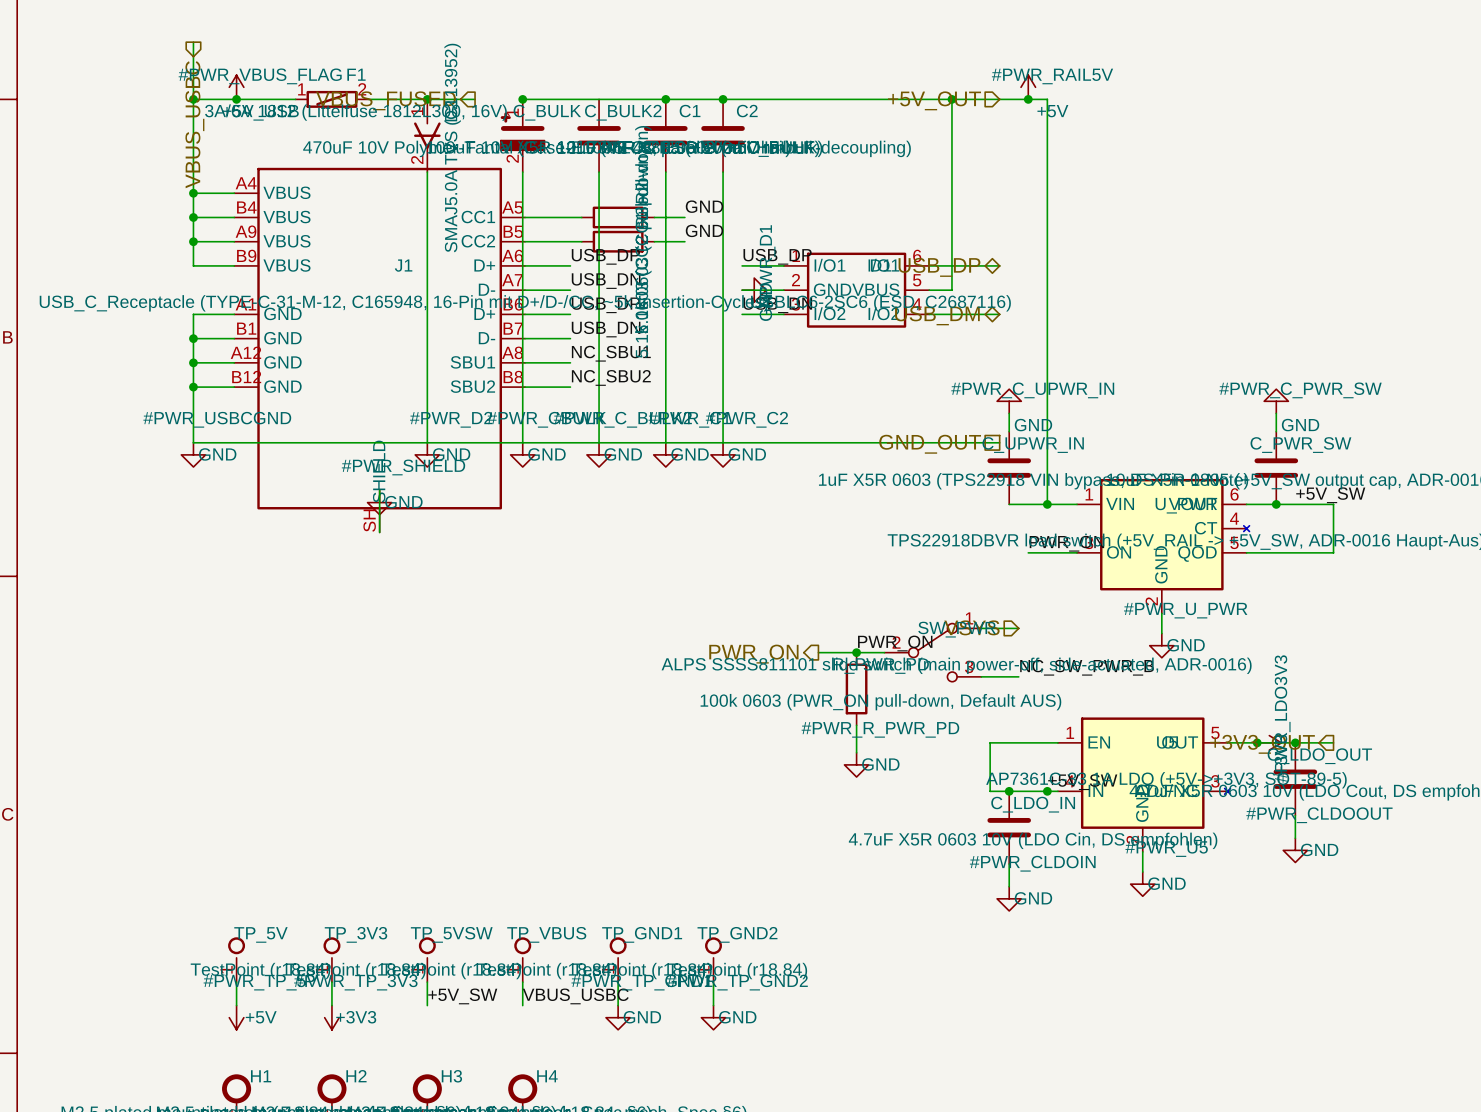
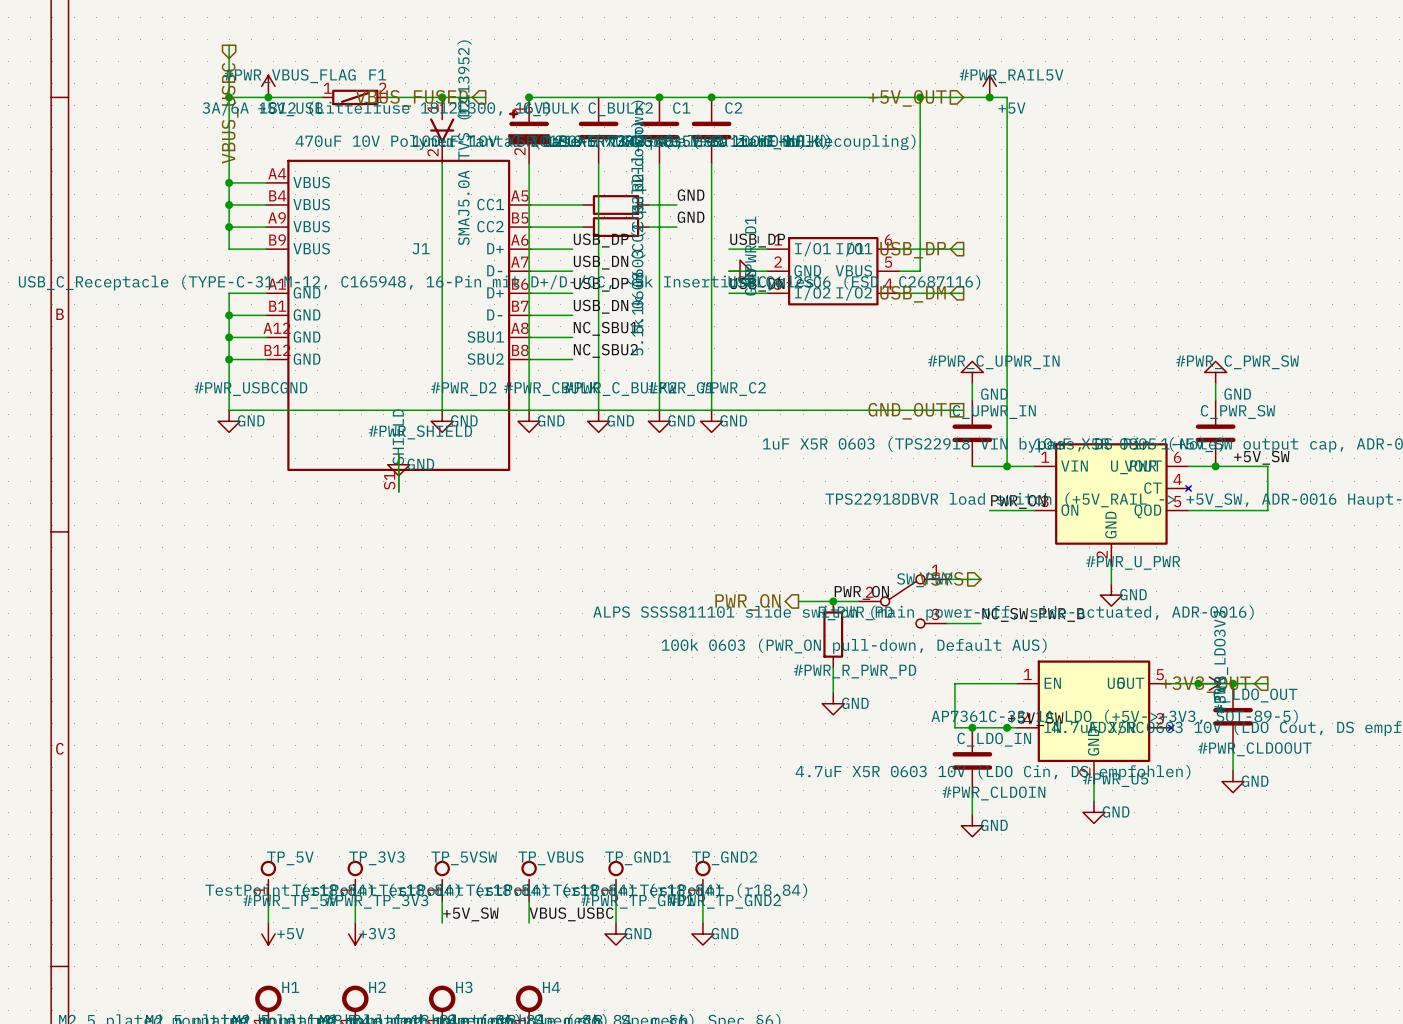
hierarchical label shape: bidirectional (939, 267) -> output (913, 250)
hierarchical label shape: bidirectional (937, 315) -> output (913, 294)
J1 pin number: SH (369, 520) -> S1 (389, 480)

